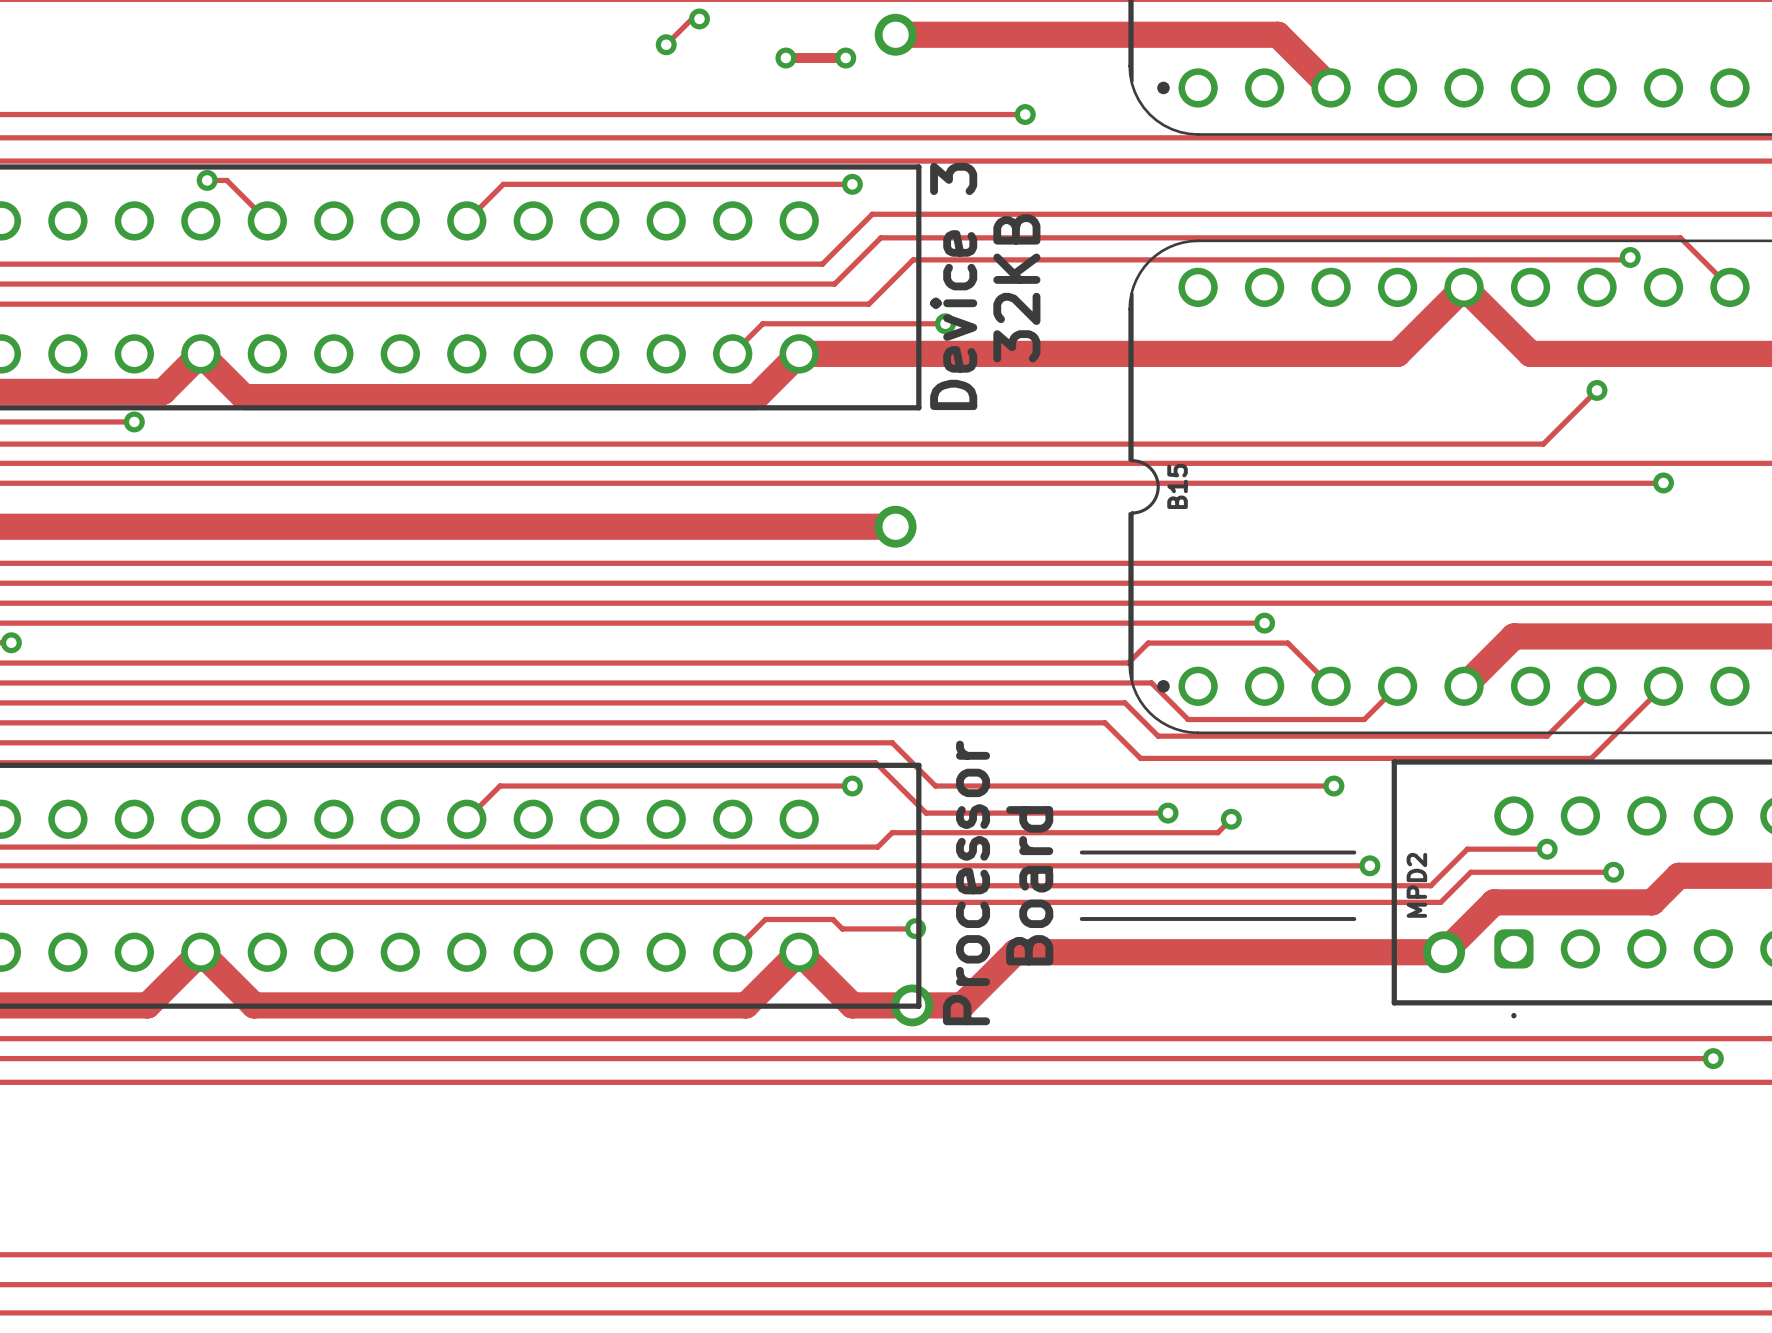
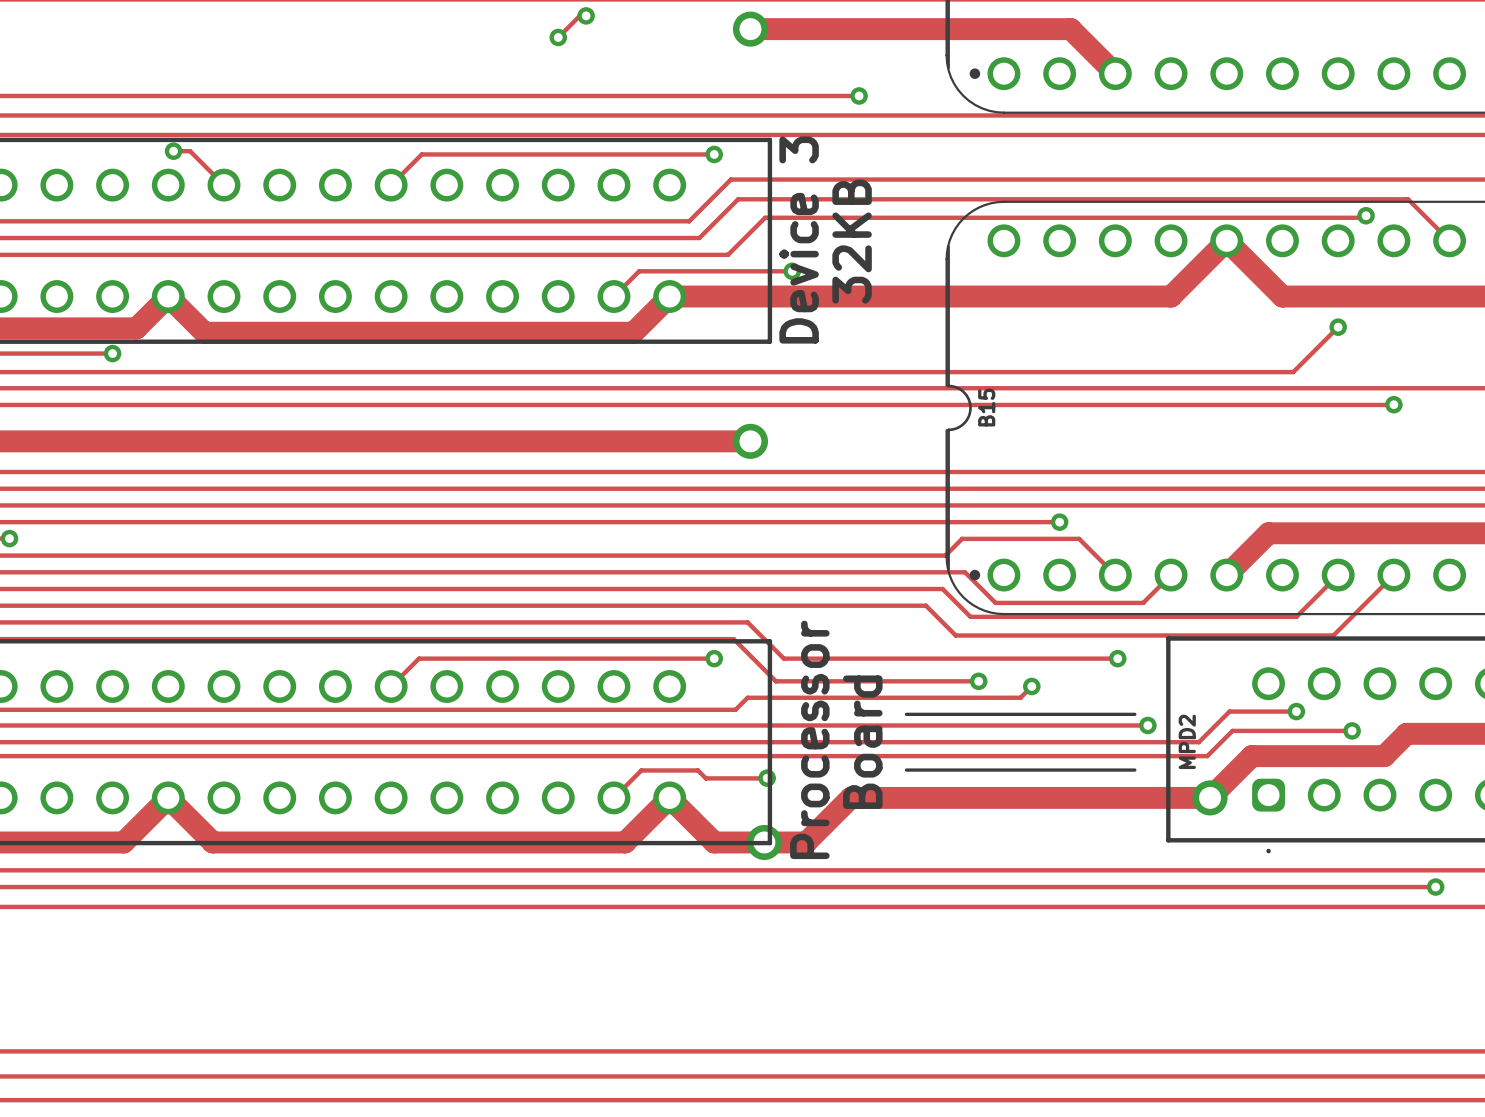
track: (785, 58) (845, 58) -> none
via: (785, 58) -> none
via: (845, 58) -> none

